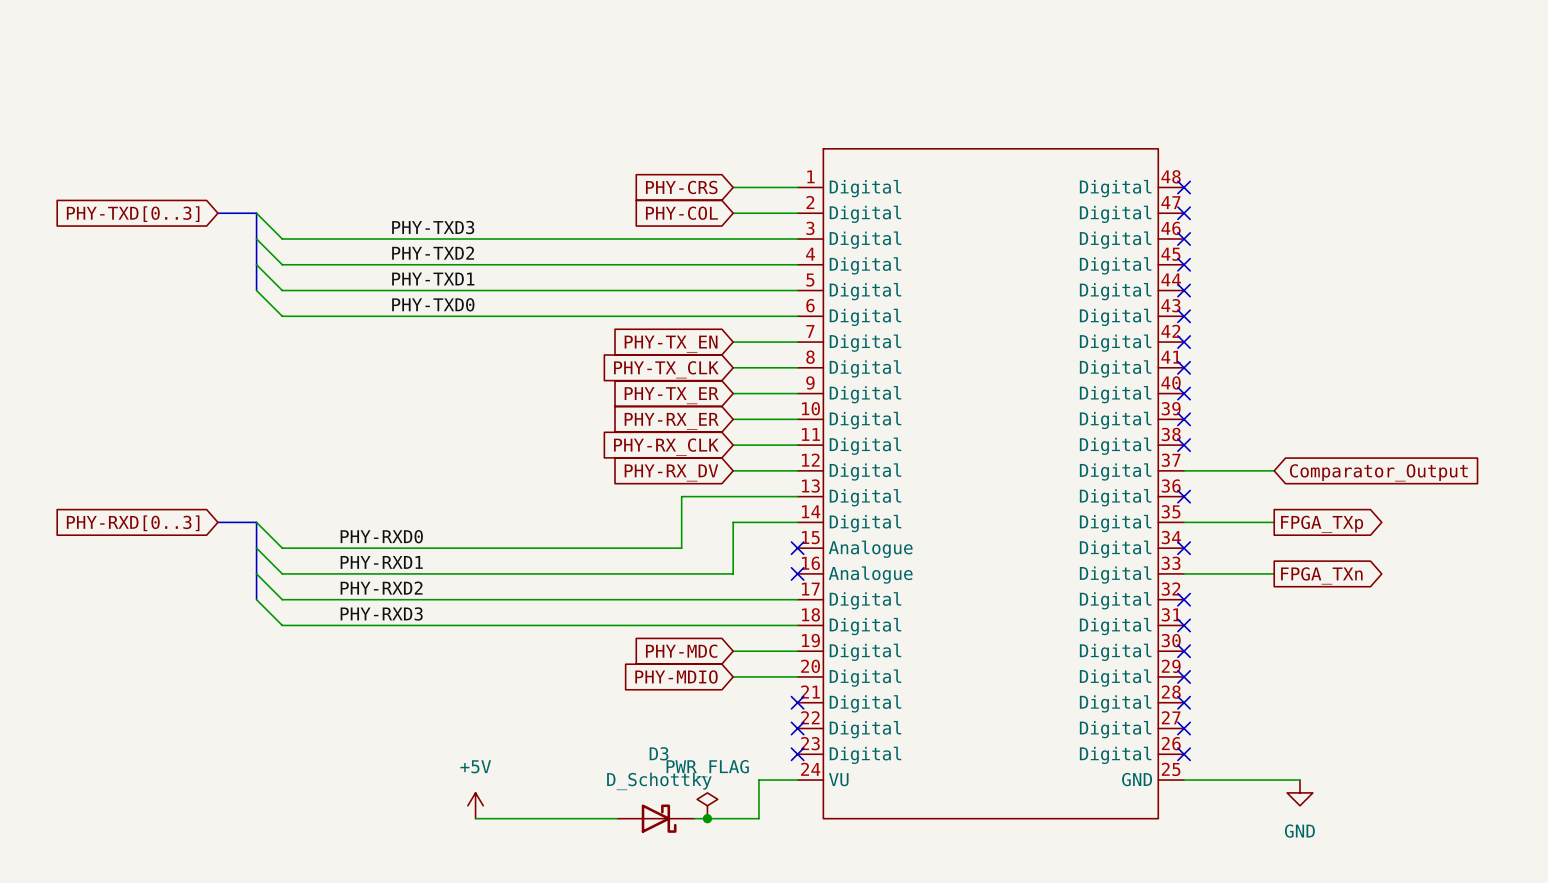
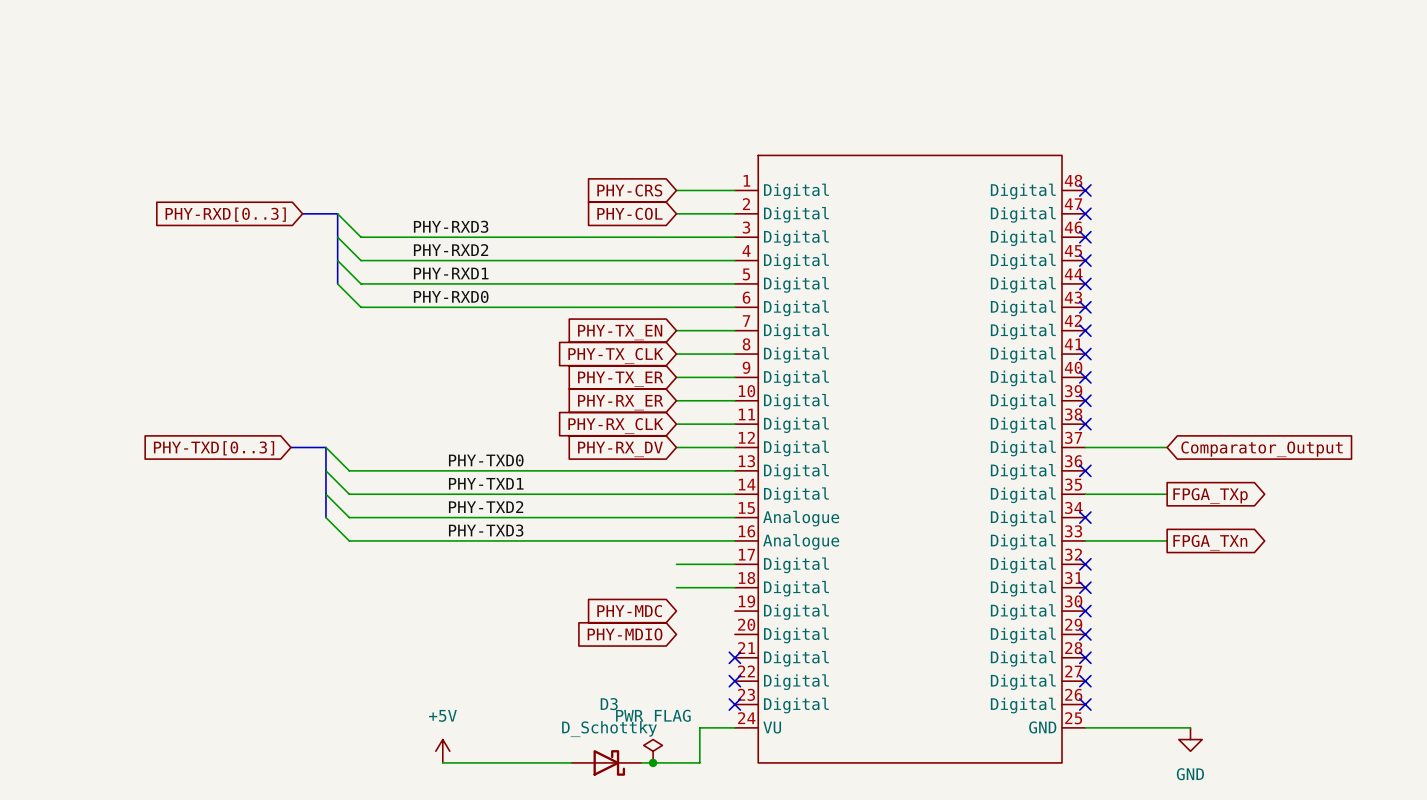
bus: (217, 213) (256, 213) (256, 290) -> (302, 213) (337, 213) (337, 283)
wire: (256, 213) (282, 239) (385, 239) -> (337, 213) (361, 237)
global label: PHY-TXD[0..3] (133, 214) -> PHY-RXD[0..3] (225, 214)
label: PHY-TXD3 (433, 227) -> none
label: none -> PHY-RXD3 (451, 226)
wire: (256, 239) (282, 264) (385, 264) -> (337, 237) (361, 260)
label: PHY-TXD2 (433, 253) -> none
label: none -> PHY-RXD2 (451, 250)
wire: (256, 264) (282, 290) (385, 290) -> (337, 260) (361, 283)
label position: PHY-TXD1 (433, 279) -> PHY-TXD1 (486, 483)
label: none -> PHY-RXD1 (451, 273)
wire: (256, 290) (282, 316) (385, 316) -> (337, 283) (361, 307)
label position: PHY-TXD0 (433, 304) -> PHY-TXD0 (486, 460)
label: none -> PHY-RXD0 (451, 296)
wire: none -> (325, 447) (349, 470) (629, 470)
global label: none -> PHY-TXD[0..3] (214, 448)
wire: none -> (325, 470) (349, 494) (676, 494)
wire: (681, 496) (681, 548) -> (734, 517) (629, 517)
bus: (217, 522) (256, 522) (256, 599) -> (290, 447) (325, 447) (325, 517)
wire: (256, 522) (282, 548) (372, 548) -> (325, 494) (349, 517)
wire: (733, 522) (733, 573) -> (734, 540) (676, 540)
global label: PHY-RXD[0..3] (133, 523) -> none
label: PHY-RXD0 (381, 536) -> none
label: none -> PHY-TXD2 (486, 507)
wire: (256, 548) (282, 573) (372, 573) -> (325, 517) (349, 540)
no-connect mark: (797, 548) -> none
label: PHY-RXD1 (381, 562) -> none
label: none -> PHY-TXD3 (486, 530)
wire: (256, 573) (282, 599) (733, 599) -> none
no-connect mark: (797, 573) -> none
label: PHY-RXD2 (381, 588) -> none
wire: (256, 599) (282, 625) (733, 625) -> none
label: PHY-RXD3 (381, 613) -> none
wire: (733, 651) (797, 651) -> none
wire: (733, 676) (797, 676) -> none

